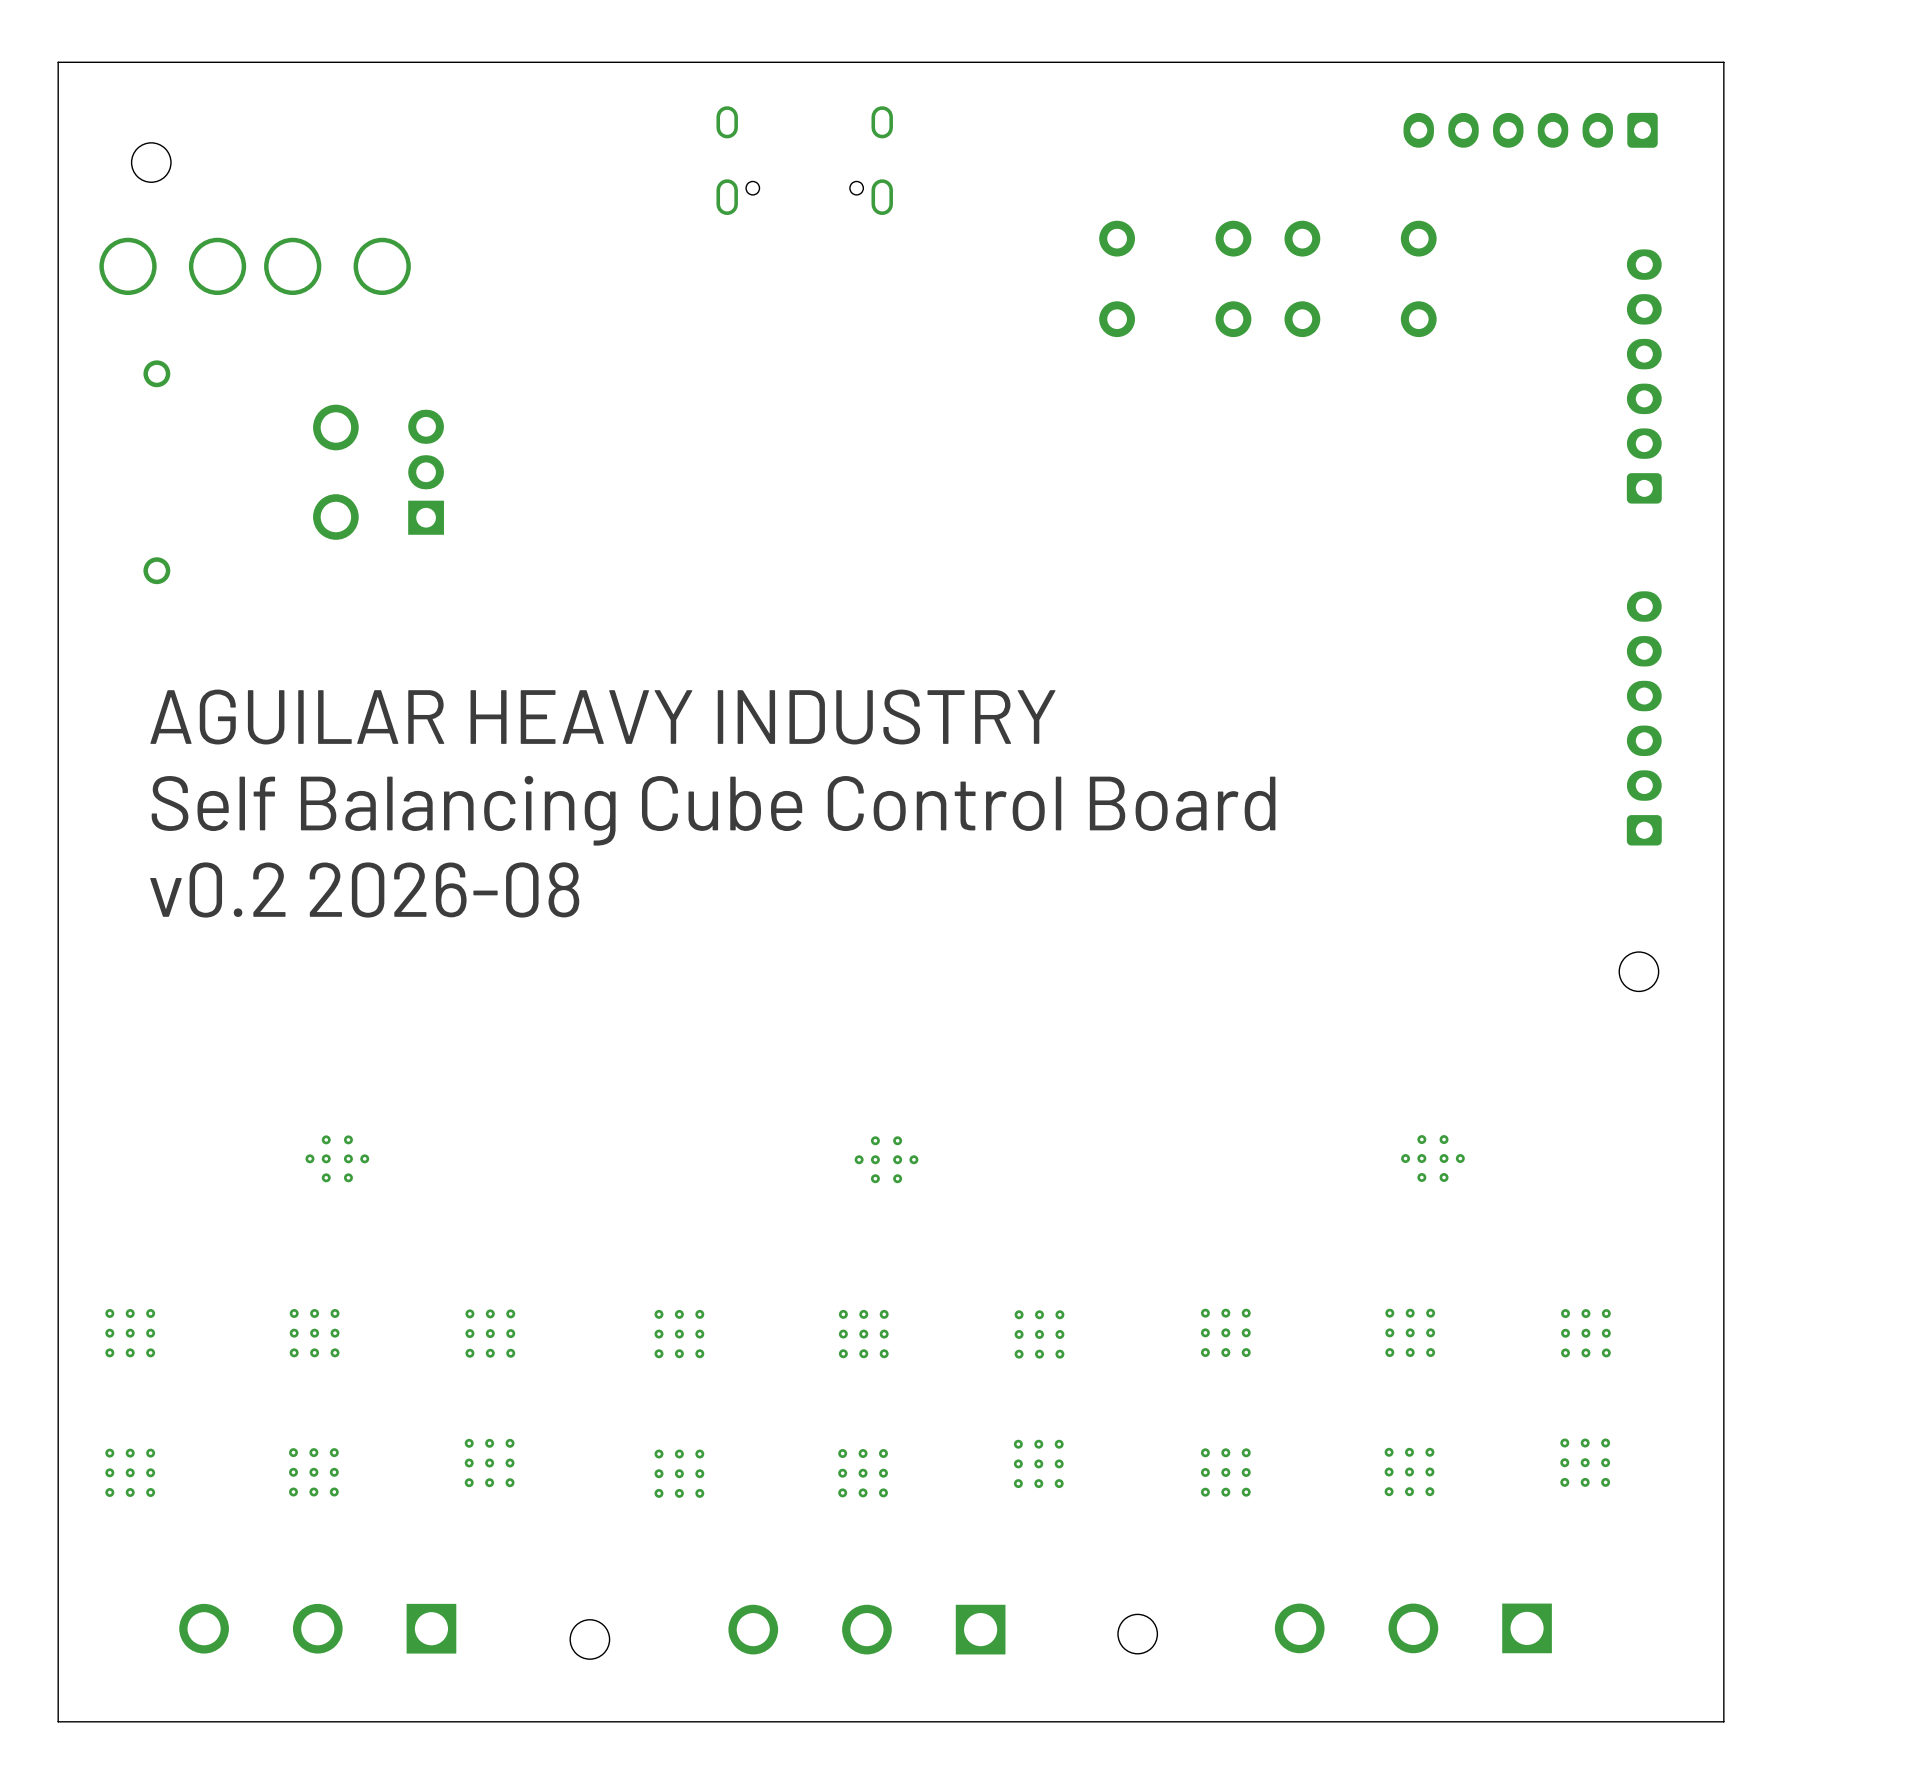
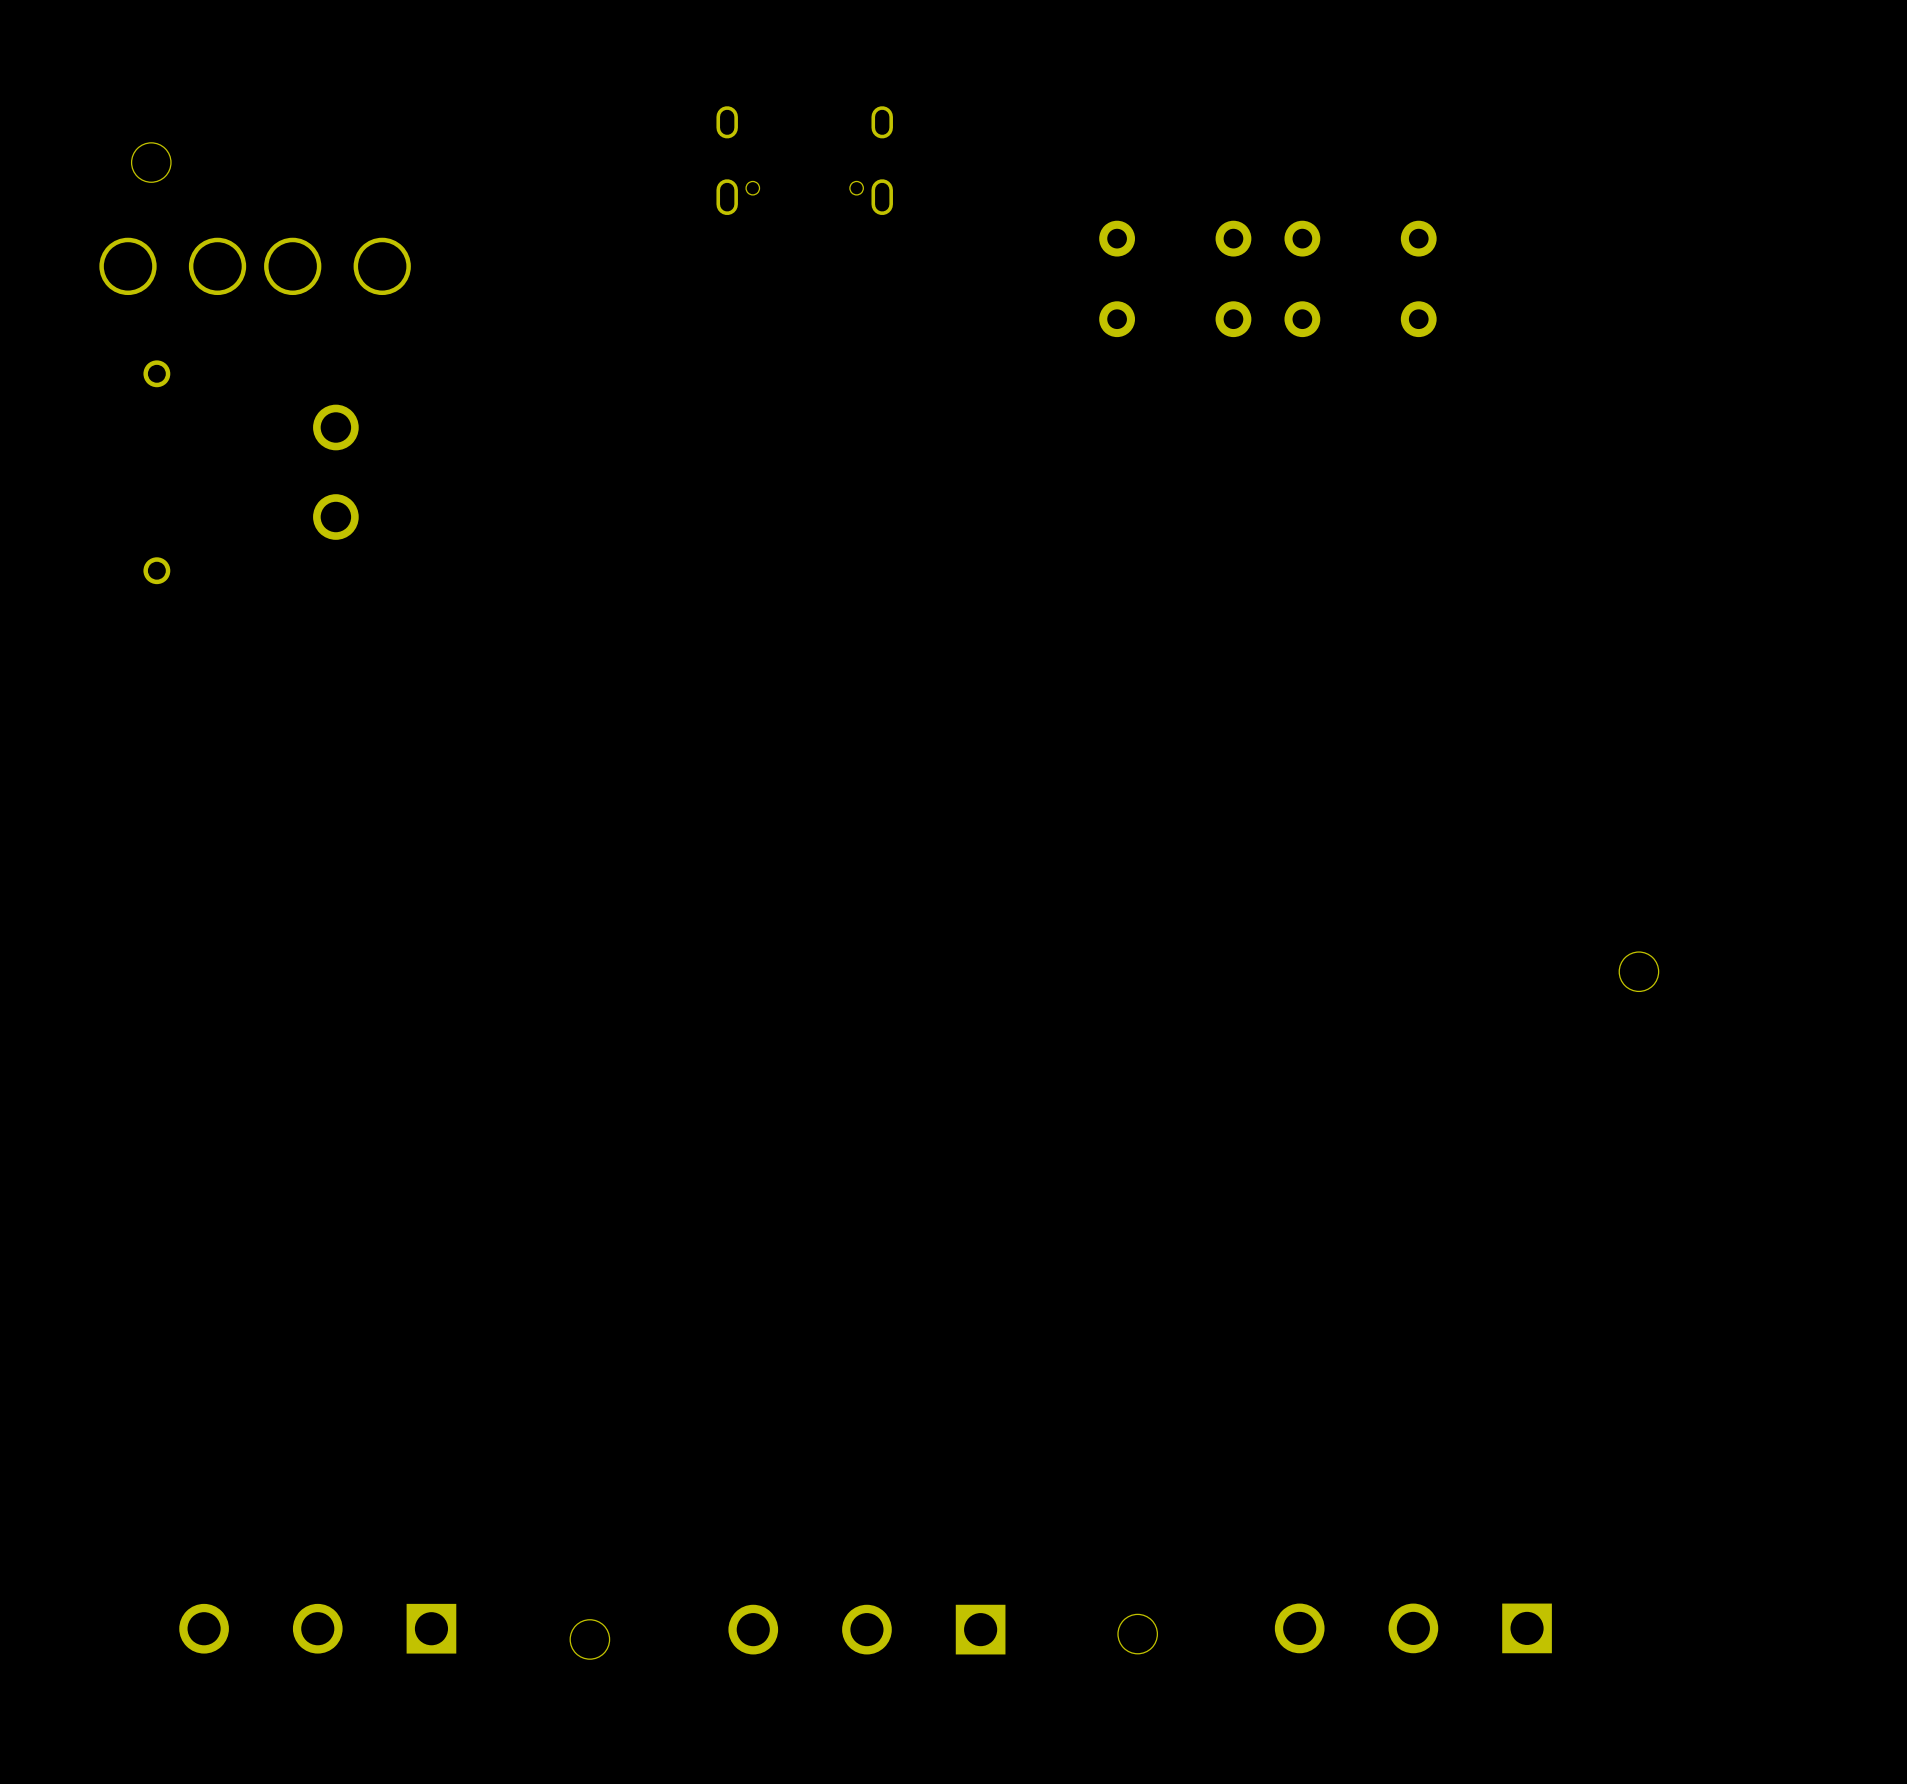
board edge: (1723, 62) (58, 62) (58, 1721) (1723, 1721) (1723, 62) -> none
part: (1530, 130) -> none
part: (1644, 376) -> none
part: (426, 472) -> none
text: AGUILAR HEAVY INDUSTRY (602, 717) -> none
part: (1644, 718) -> none
text: Self Balancing Cube Control Board (713, 810) -> none
text: v0.2 2026-08 (364, 889) -> none
part: (337, 1158) -> none
part: (1432, 1158) -> none
part: (886, 1159) -> none
part: (1225, 1332) -> none
part: (1410, 1332) -> none
part: (130, 1333) -> none
part: (314, 1333) -> none
part: (490, 1333) -> none
part: (1585, 1333) -> none
part: (679, 1334) -> none
part: (863, 1334) -> none
part: (1039, 1334) -> none
part: (1585, 1462) -> none
part: (489, 1463) -> none
part: (1038, 1463) -> none
part: (1409, 1471) -> none
part: (130, 1472) -> none
part: (313, 1472) -> none
part: (1225, 1472) -> none
part: (679, 1473) -> none
part: (863, 1473) -> none

